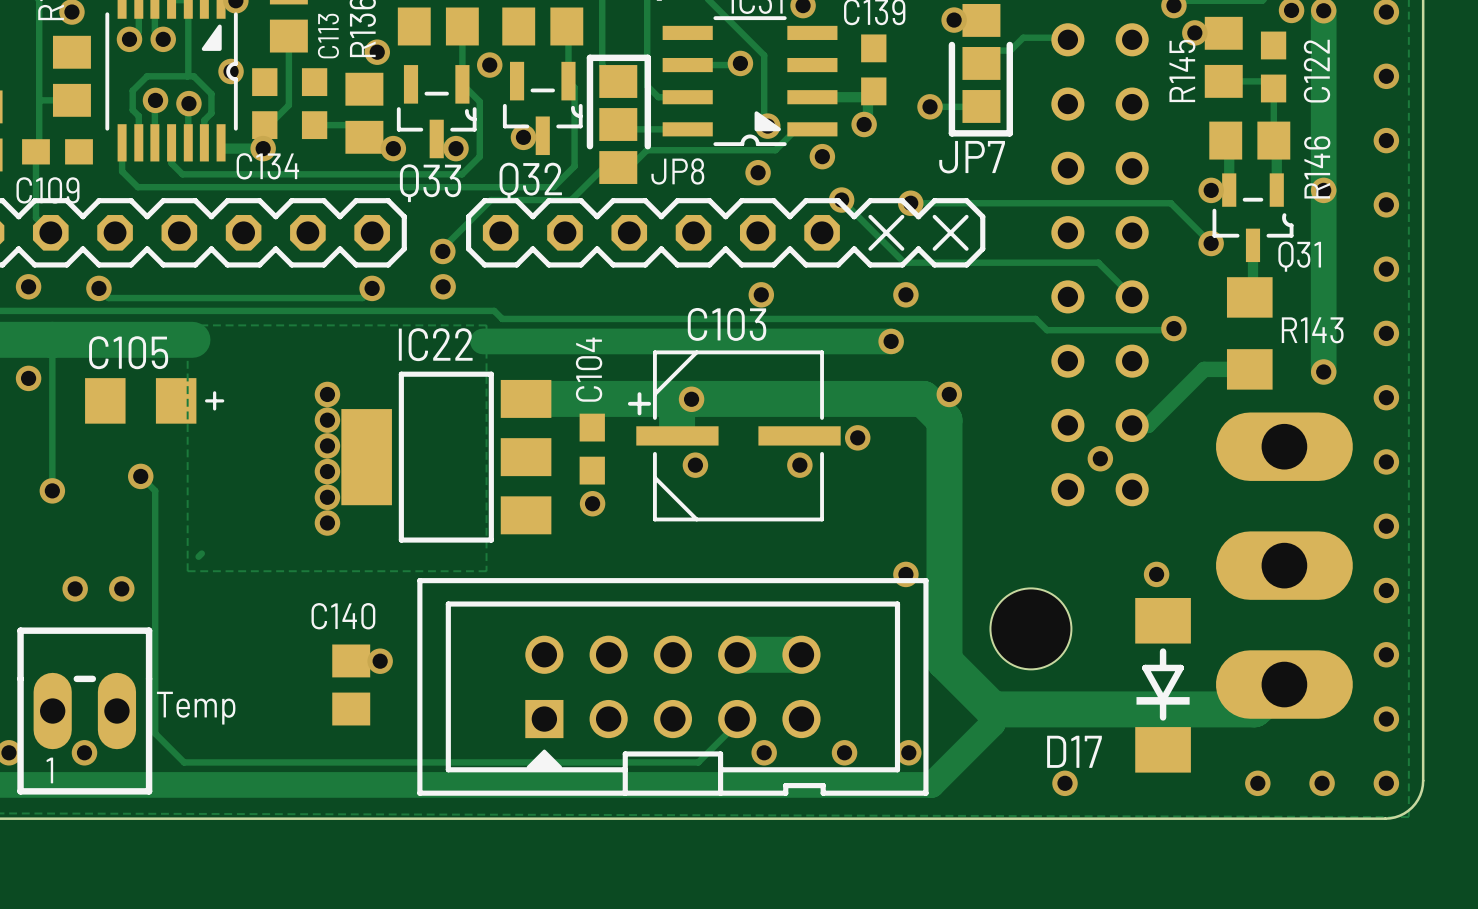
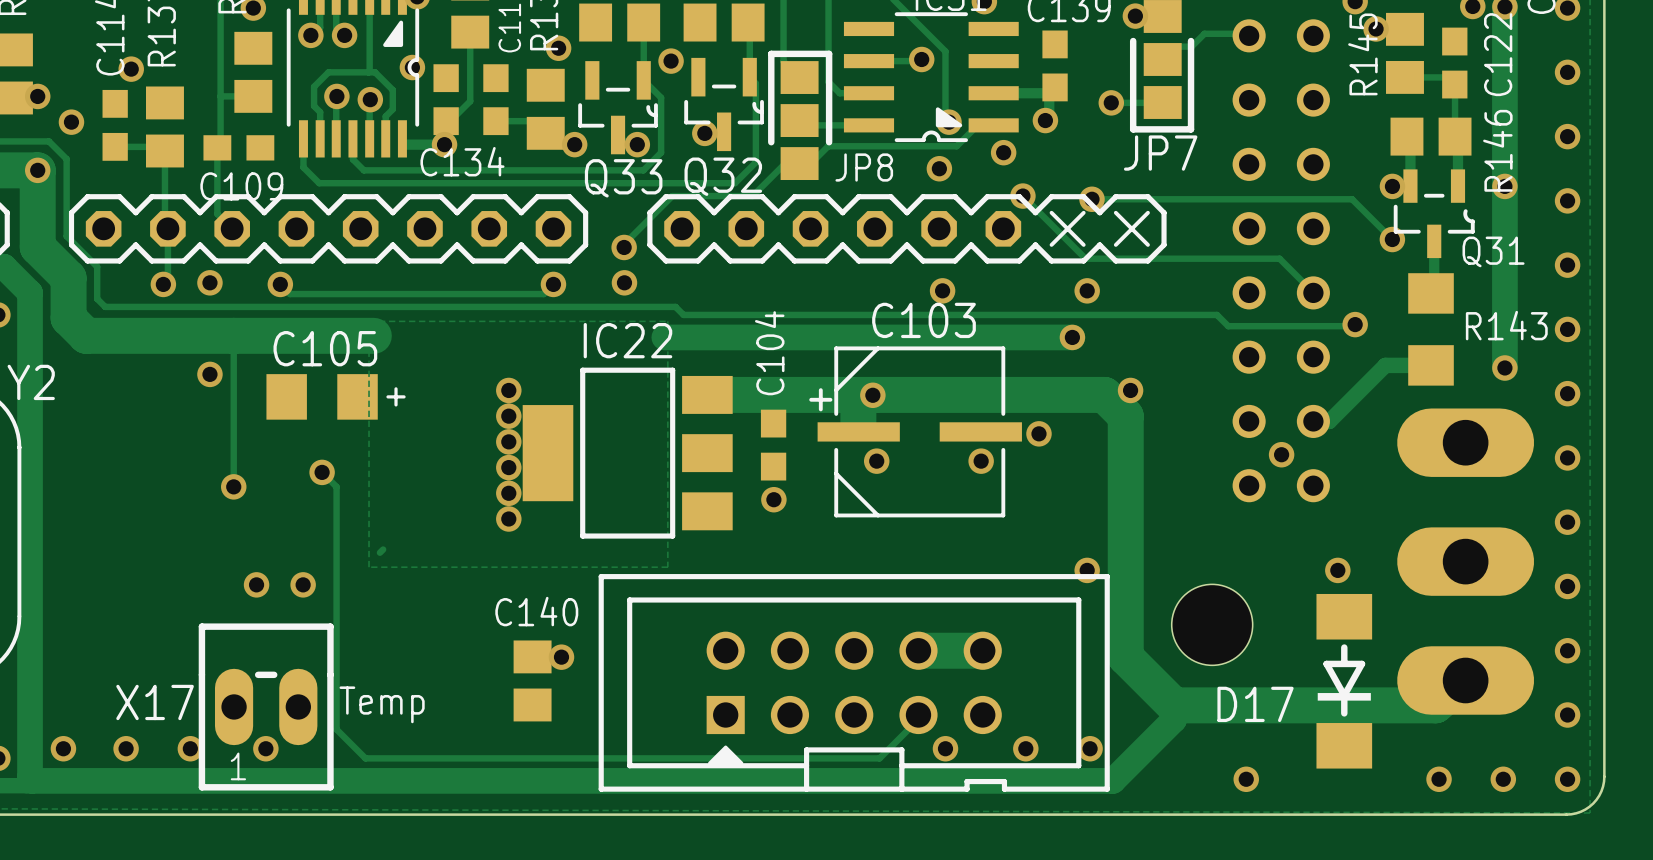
D17 name position: D17 (1074, 751) -> D17 (1255, 704)

